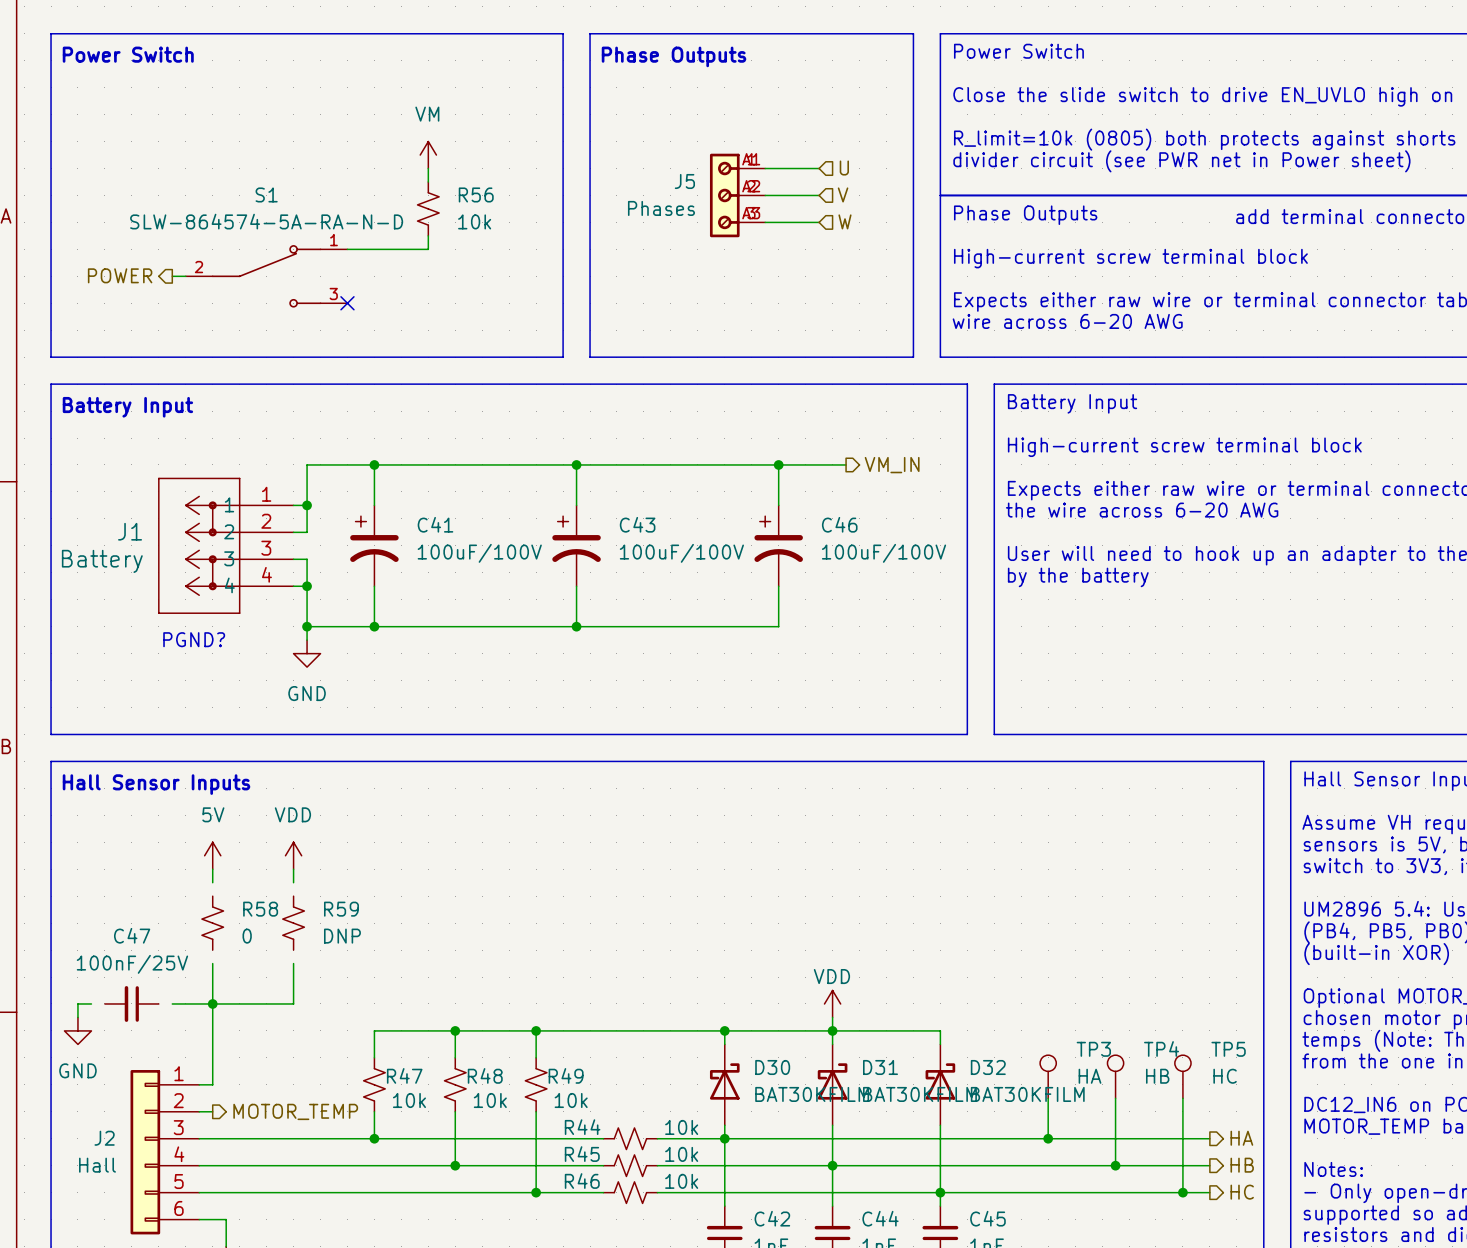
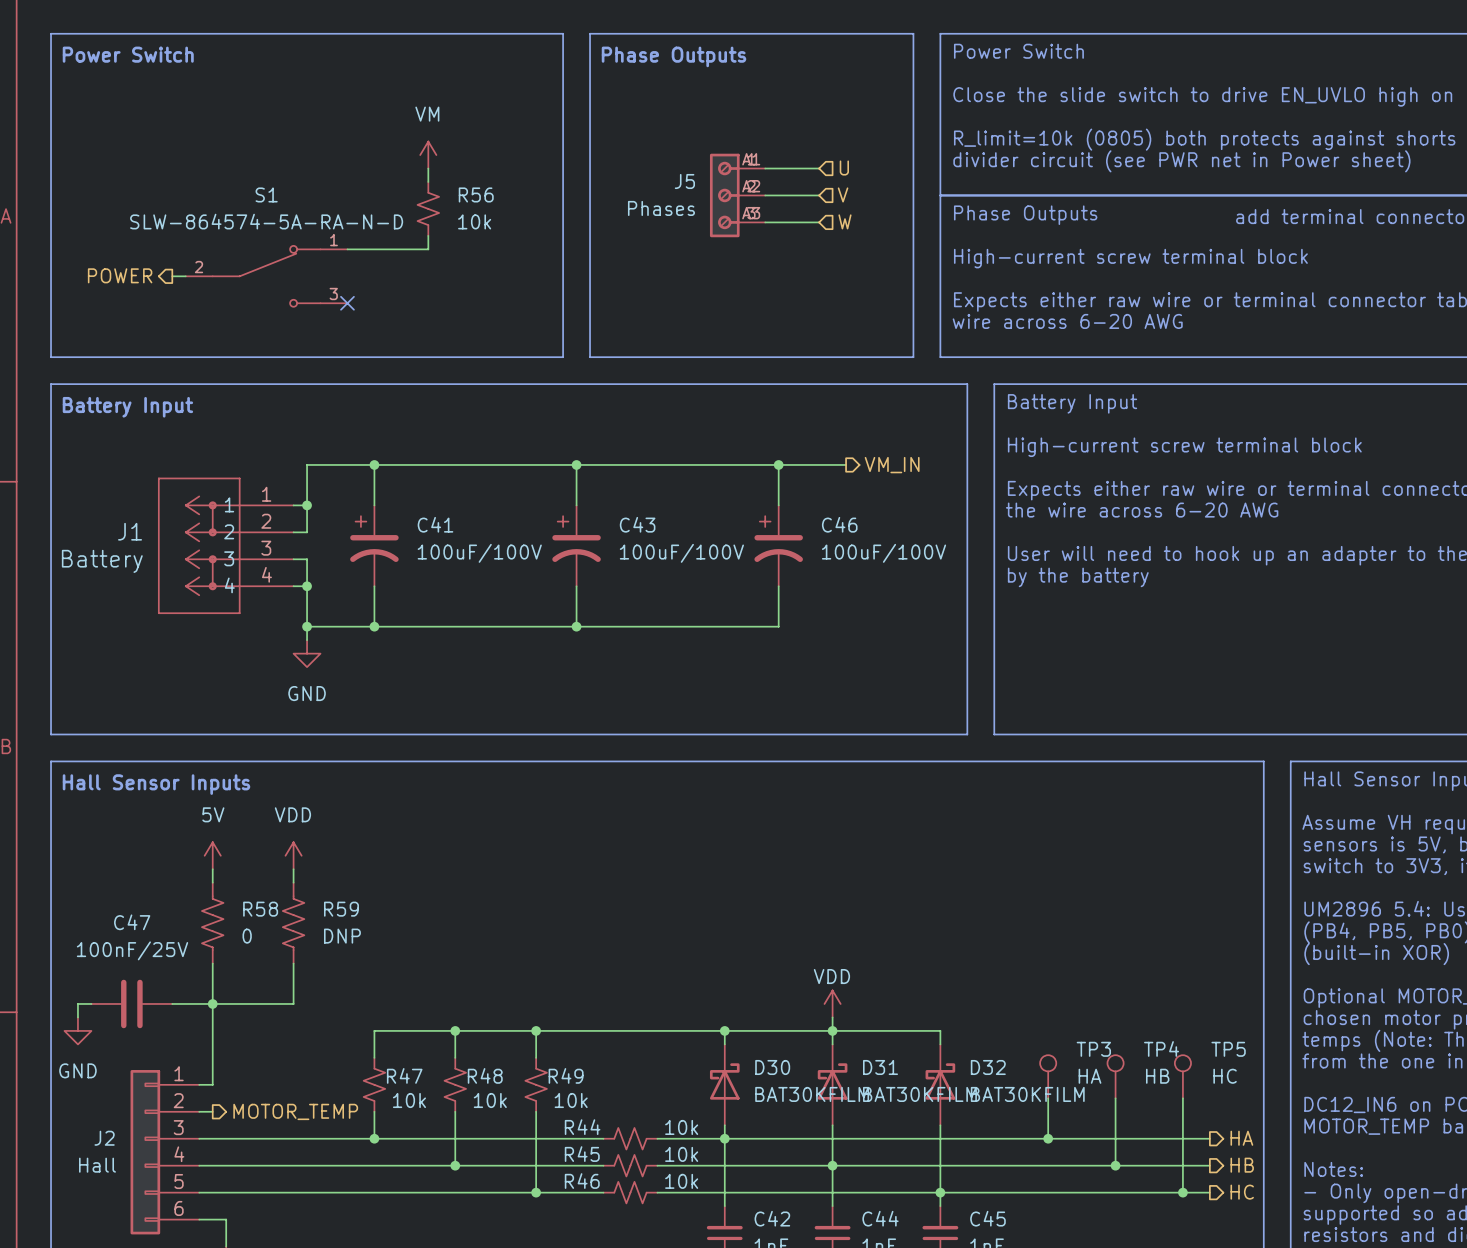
text: PGND? (194, 639) -> none
R58 symbol: [201, 896, 224, 951] -> [201, 882, 224, 964]
R59 symbol: [282, 896, 305, 951] -> [282, 882, 305, 964]
C47 symbol: [104, 986, 159, 1022] -> [91, 979, 173, 1029]

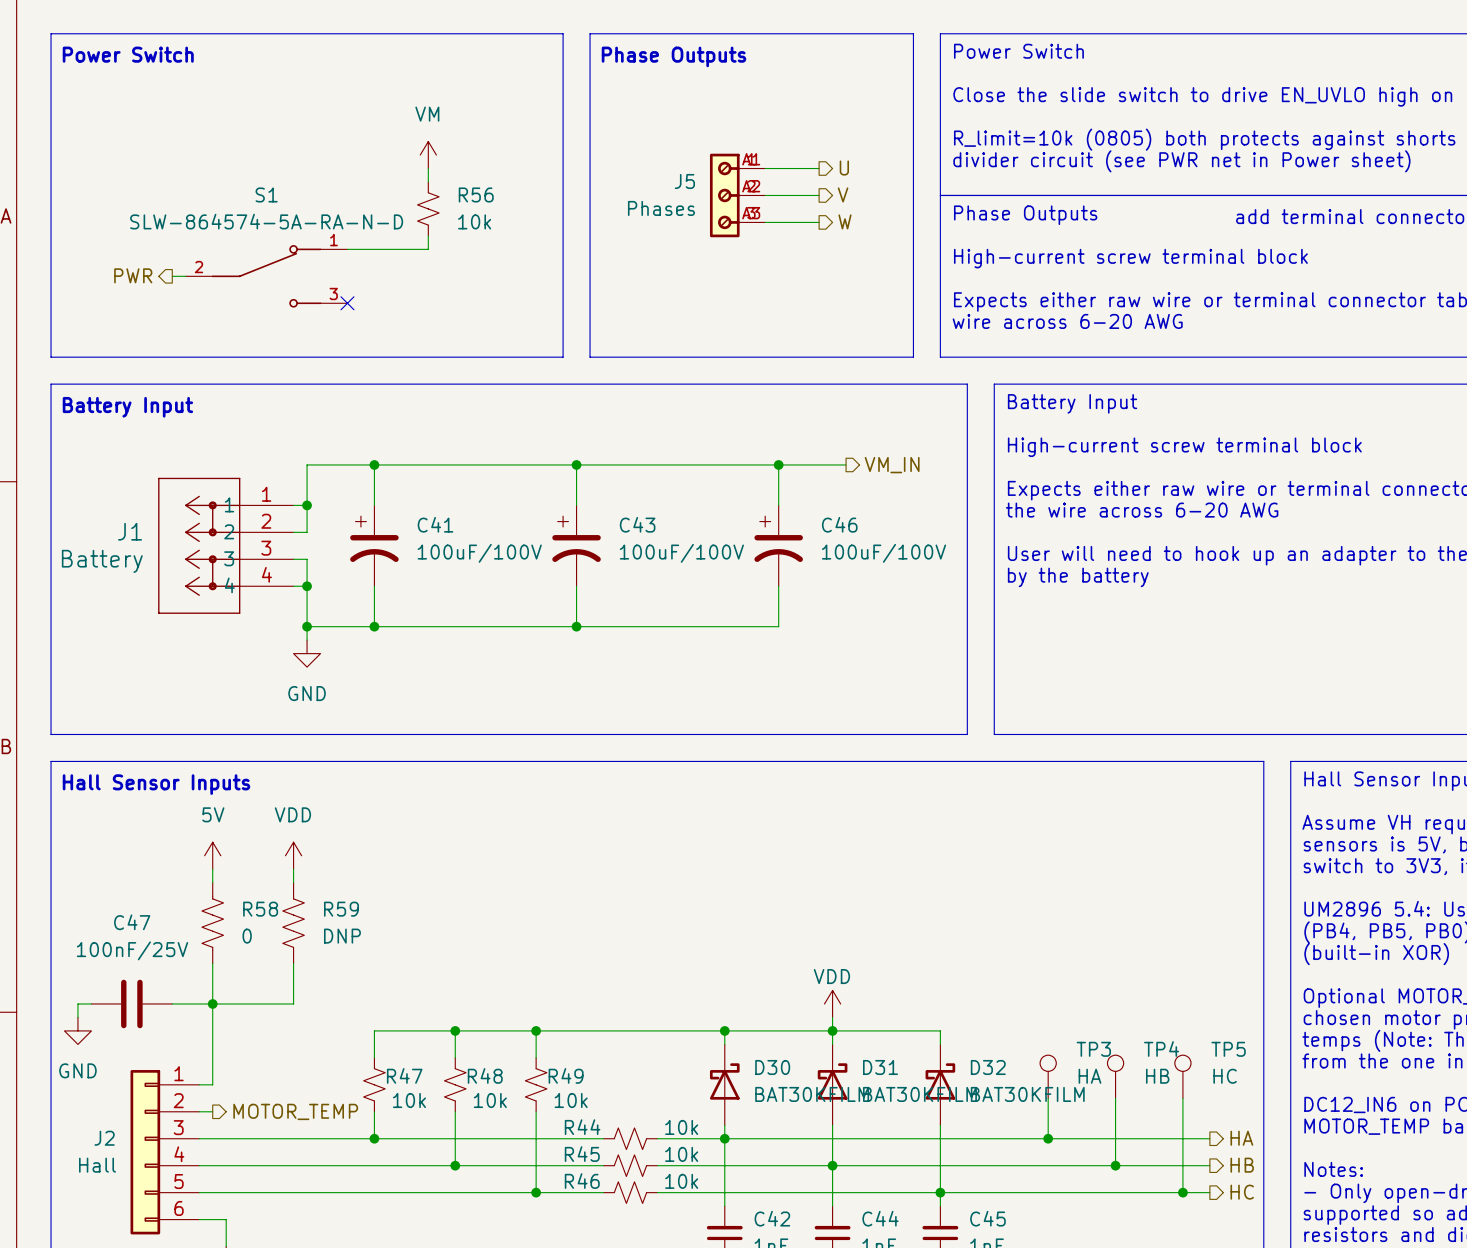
hierarchical label shape: input (844, 168) -> output (844, 168)
hierarchical label shape: input (843, 194) -> output (843, 194)
hierarchical label shape: input (844, 221) -> output (844, 221)
hierarchical label: POWER (120, 275) -> PWR (133, 275)

